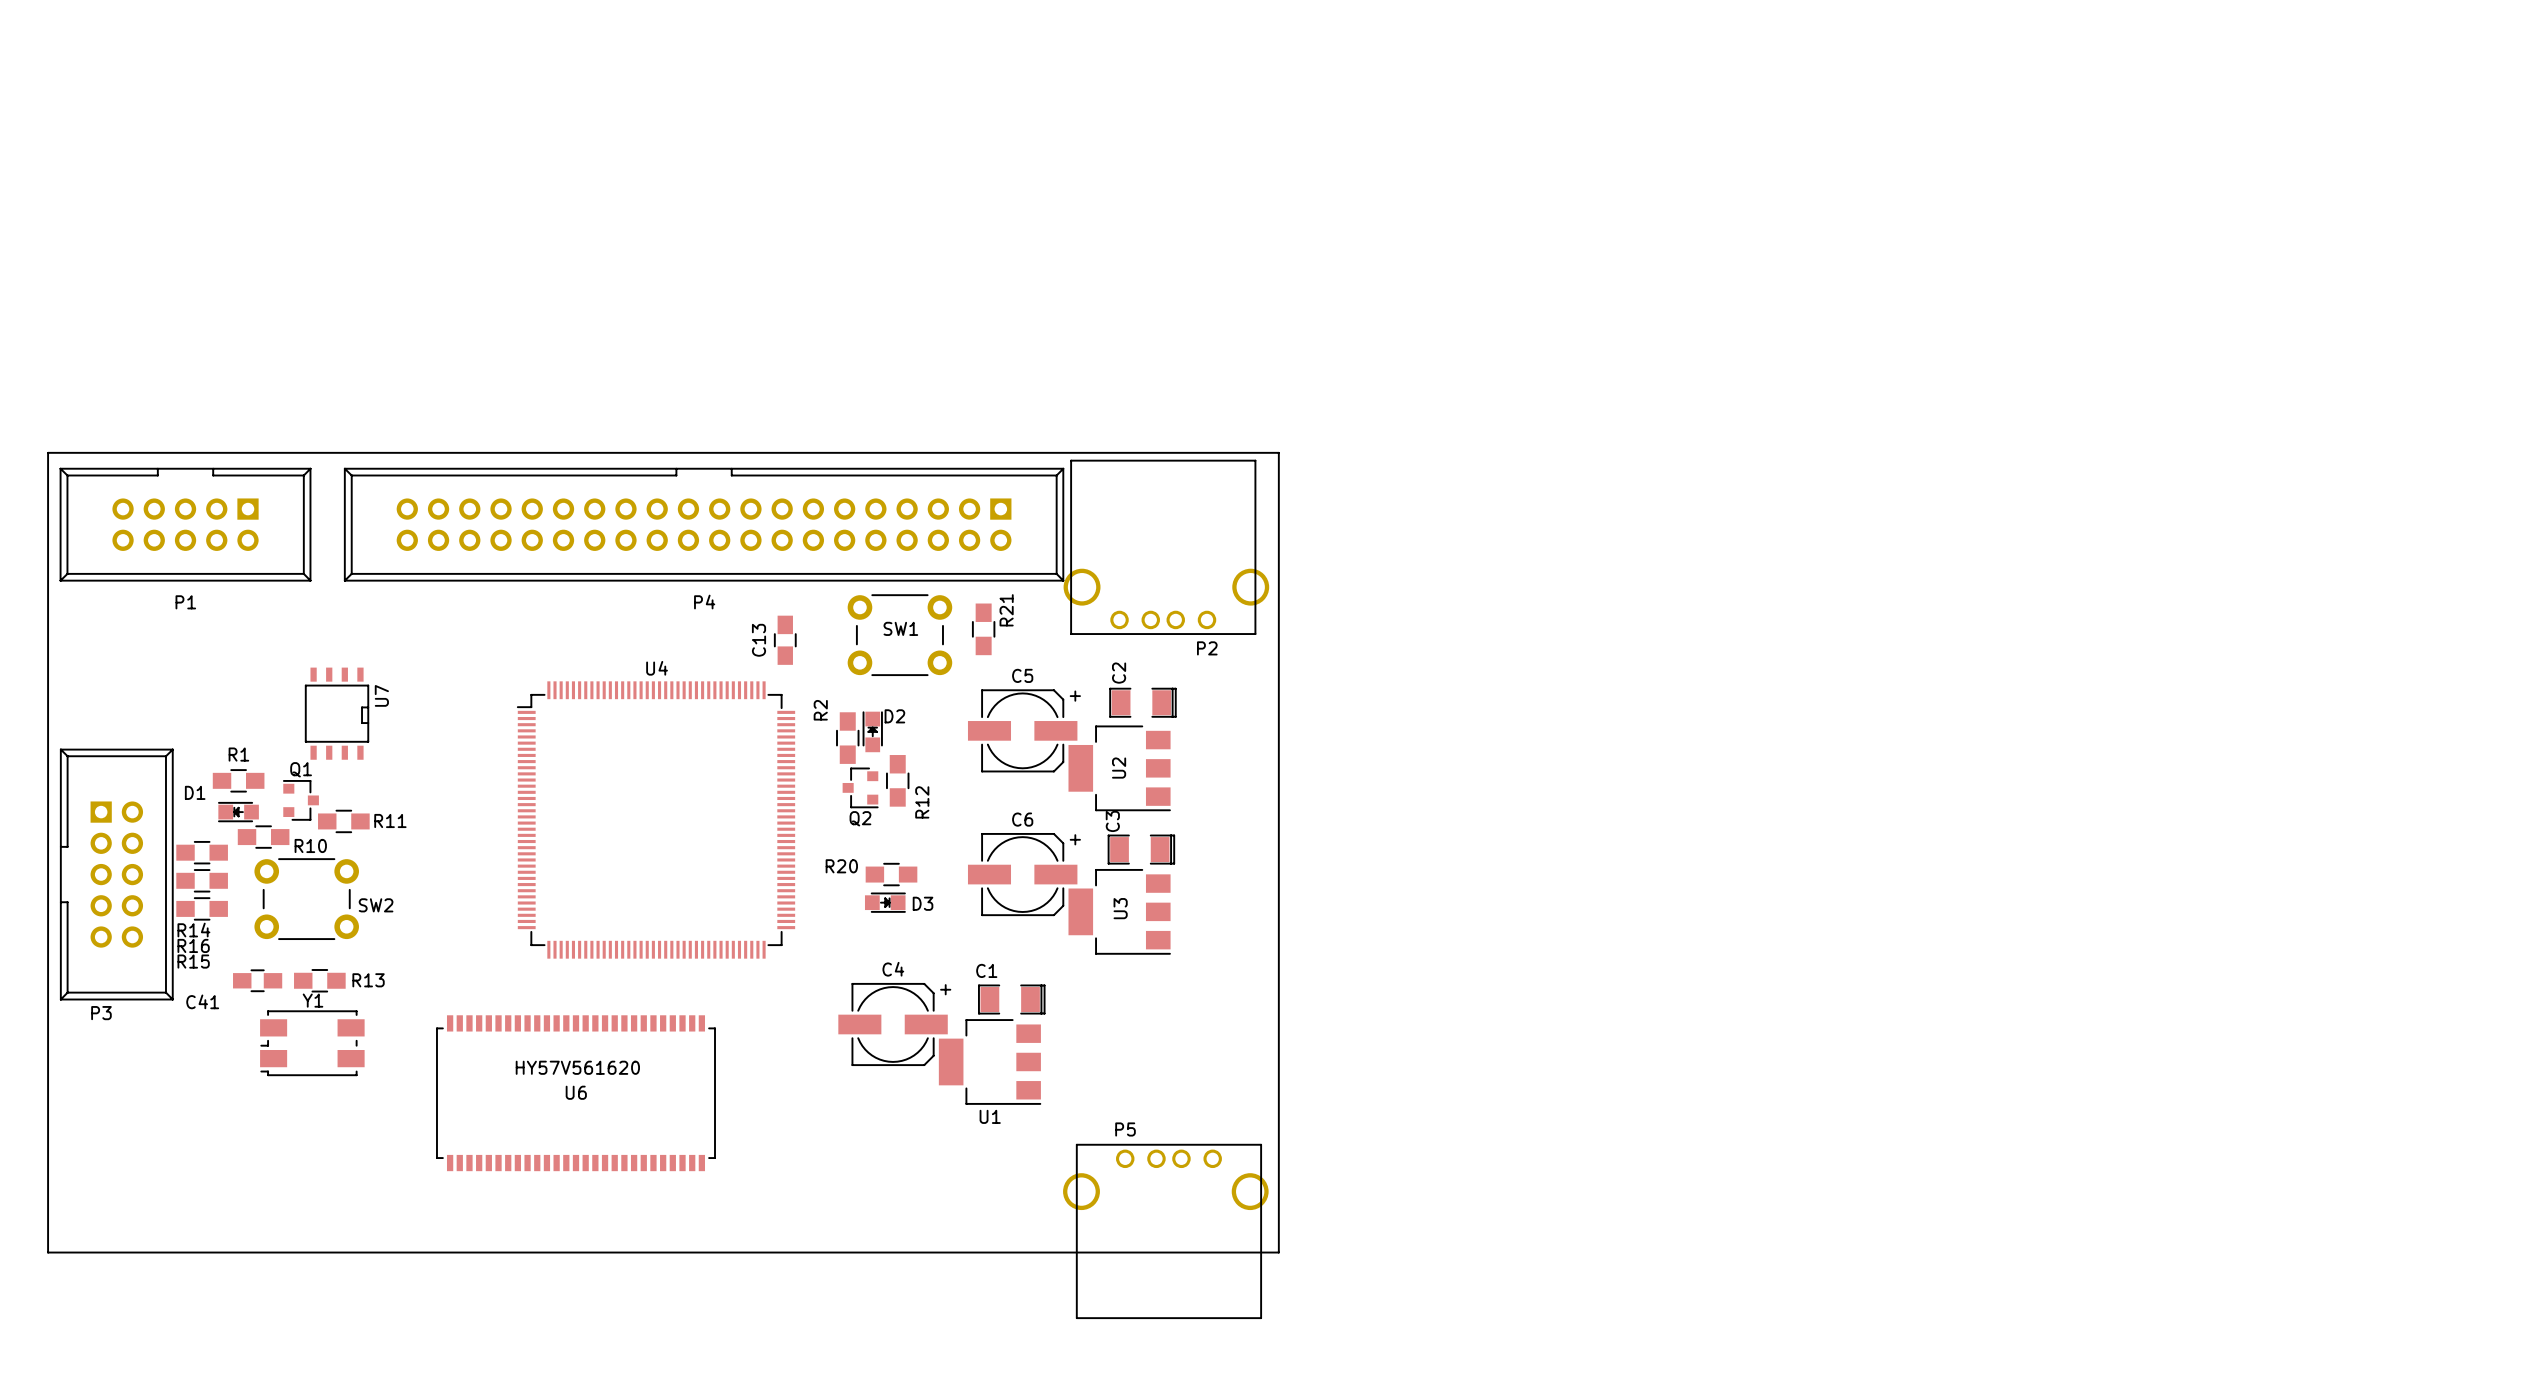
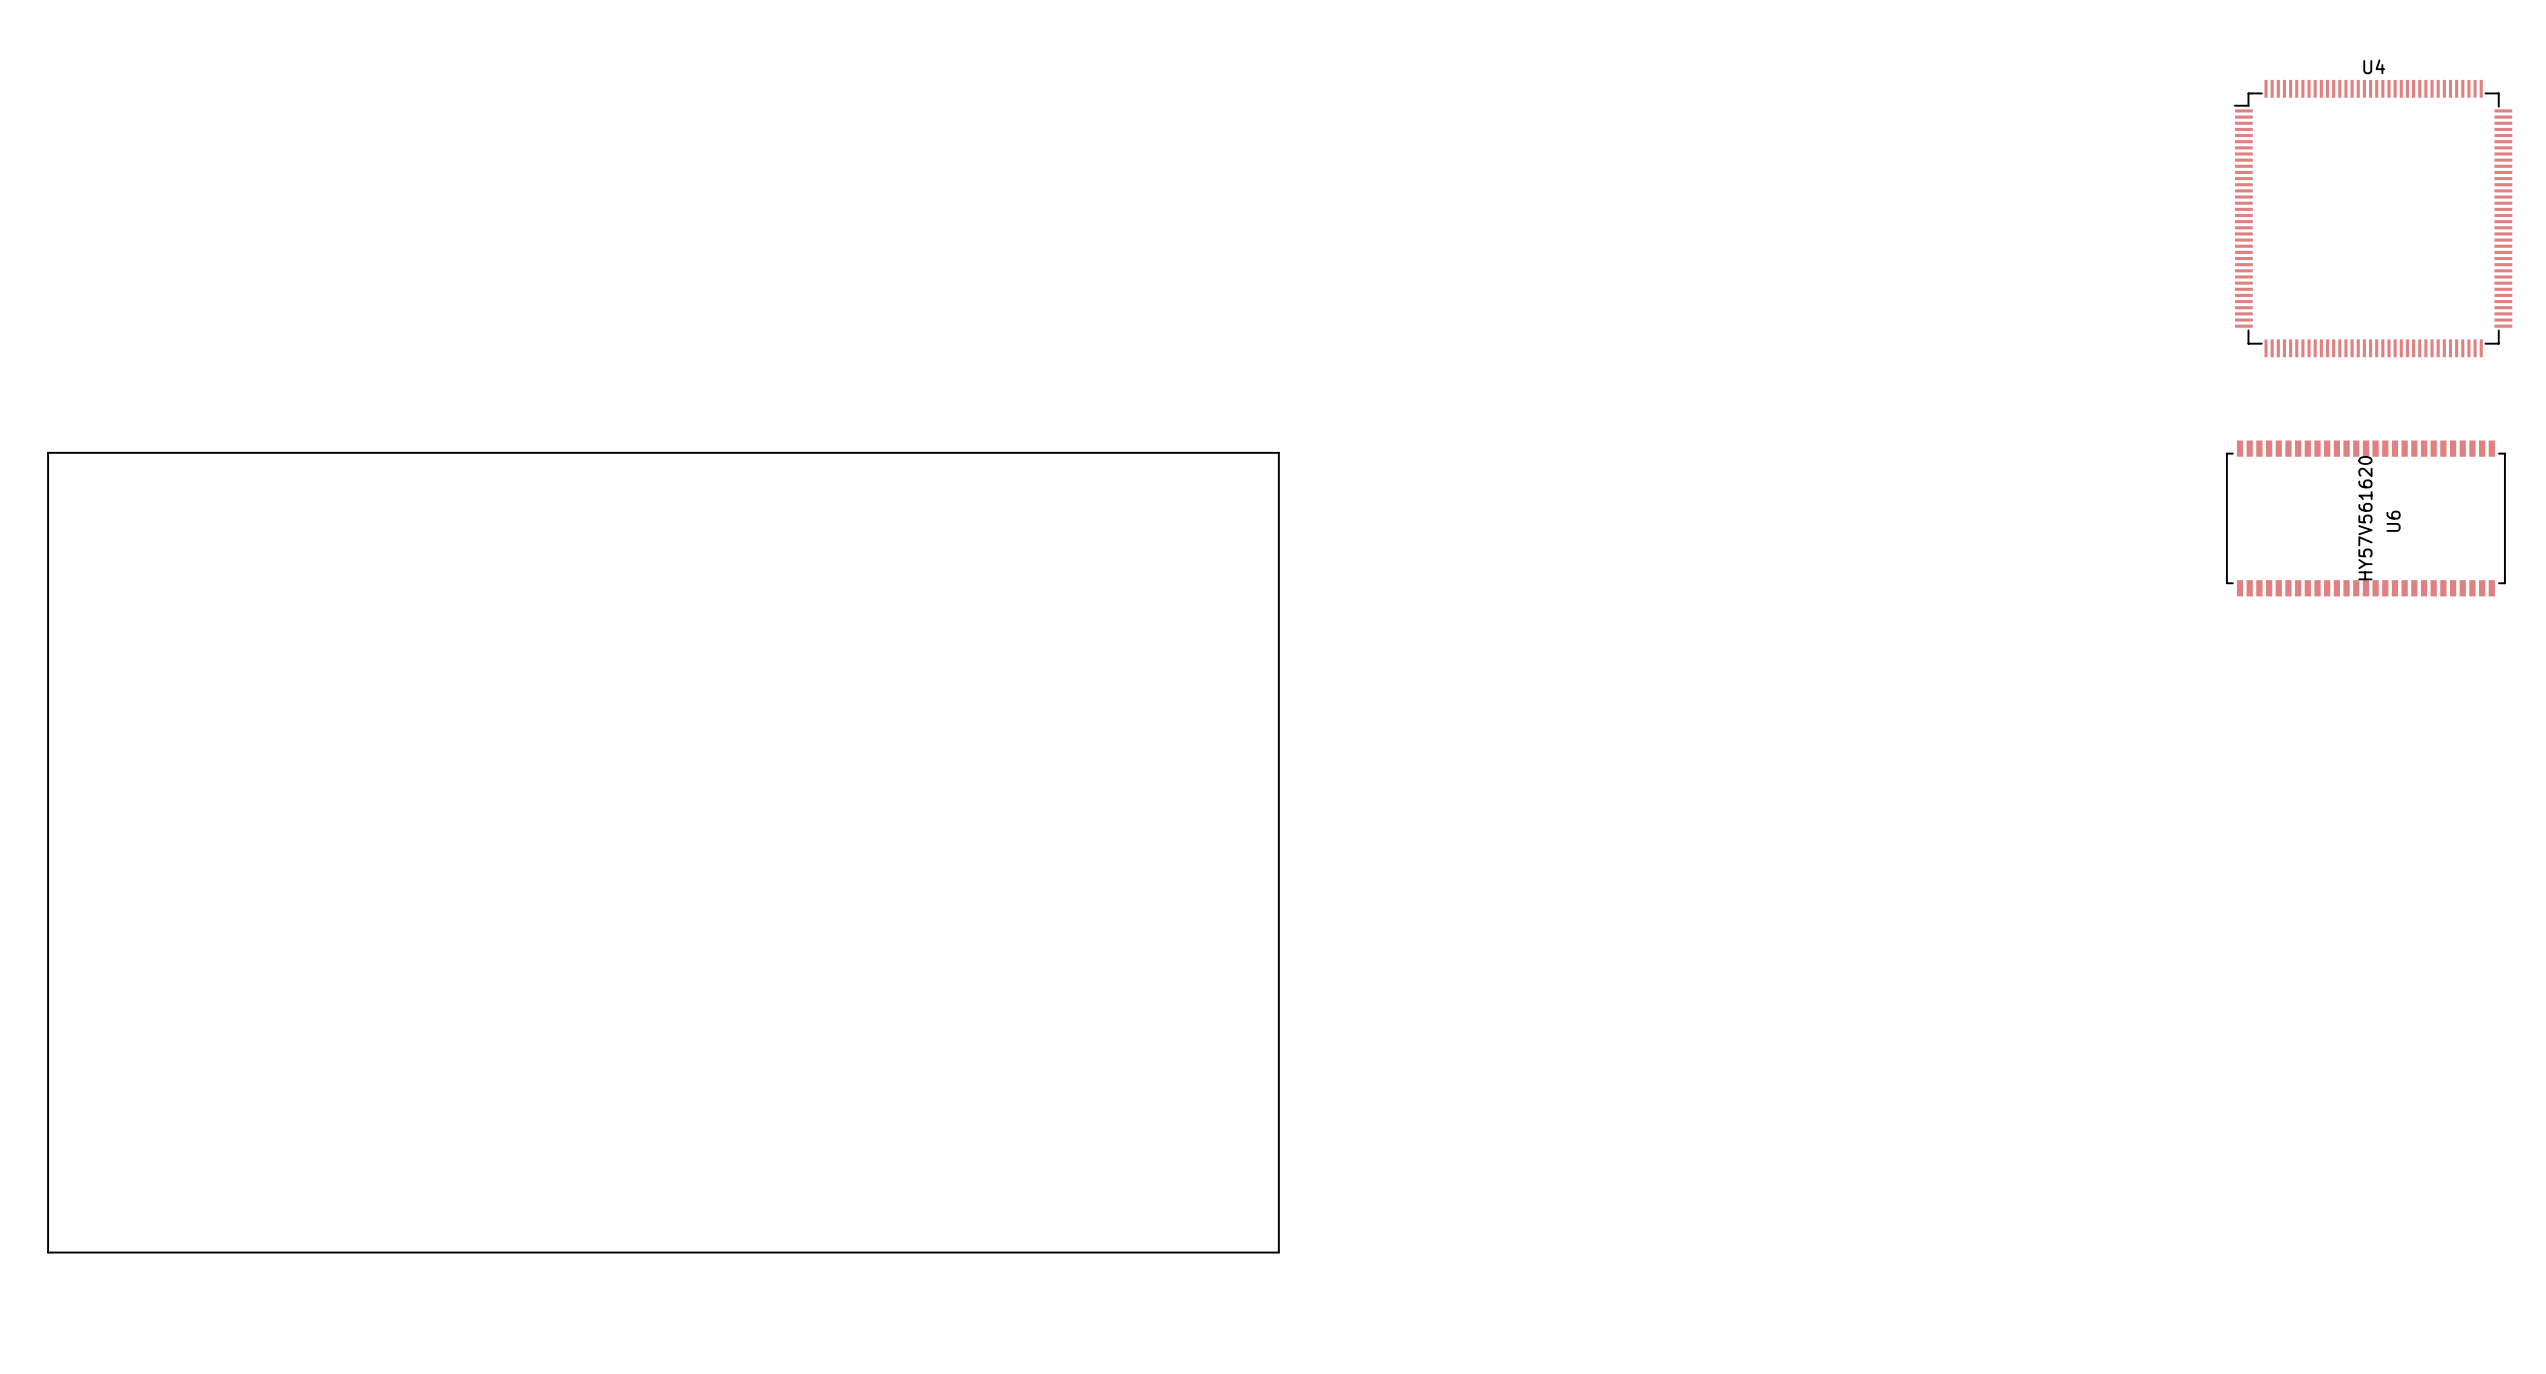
P1: (185, 524) -> none
P4: (704, 524) -> none
P2: (1166, 547) -> none
R21: (983, 629) -> none
SW1: (899, 635) -> none
C13: (785, 640) -> none
C2: (1142, 702) -> none
U7: (337, 713) -> none
C5: (1022, 730) -> none
D2: (872, 731) -> none
R2: (847, 738) -> none
U2: (1119, 768) -> none
R1: (238, 780) -> none
R12: (897, 780) -> none
Q2: (860, 787) -> none
Q1: (301, 800) -> none
D1: (238, 812) -> none
U4 position: (656, 820) -> (2373, 218)
R11: (343, 821) -> none
R10: (263, 837) -> none
C3: (1141, 849) -> none
R14: (202, 852) -> none
P3: (116, 874) -> none
R20: (891, 874) -> none
C6: (1022, 874) -> none
R16: (202, 880) -> none
SW2: (306, 899) -> none
D3: (885, 902) -> none
R15: (202, 908) -> none
U3: (1119, 911) -> none
C41: (257, 980) -> none
R13: (319, 980) -> none
C1: (1011, 999) -> none
C4: (893, 1024) -> none
Y1: (312, 1043) -> none
U1: (989, 1061) -> none
U6 value rotation: 0° (577, 1067) -> 90° counterclockwise (2365, 518)
U6 name rotation: 0° (576, 1092) -> 90° counterclockwise (2393, 521)
U6 position: (575, 1093) -> (2365, 518)
P5: (1165, 1231) -> none

